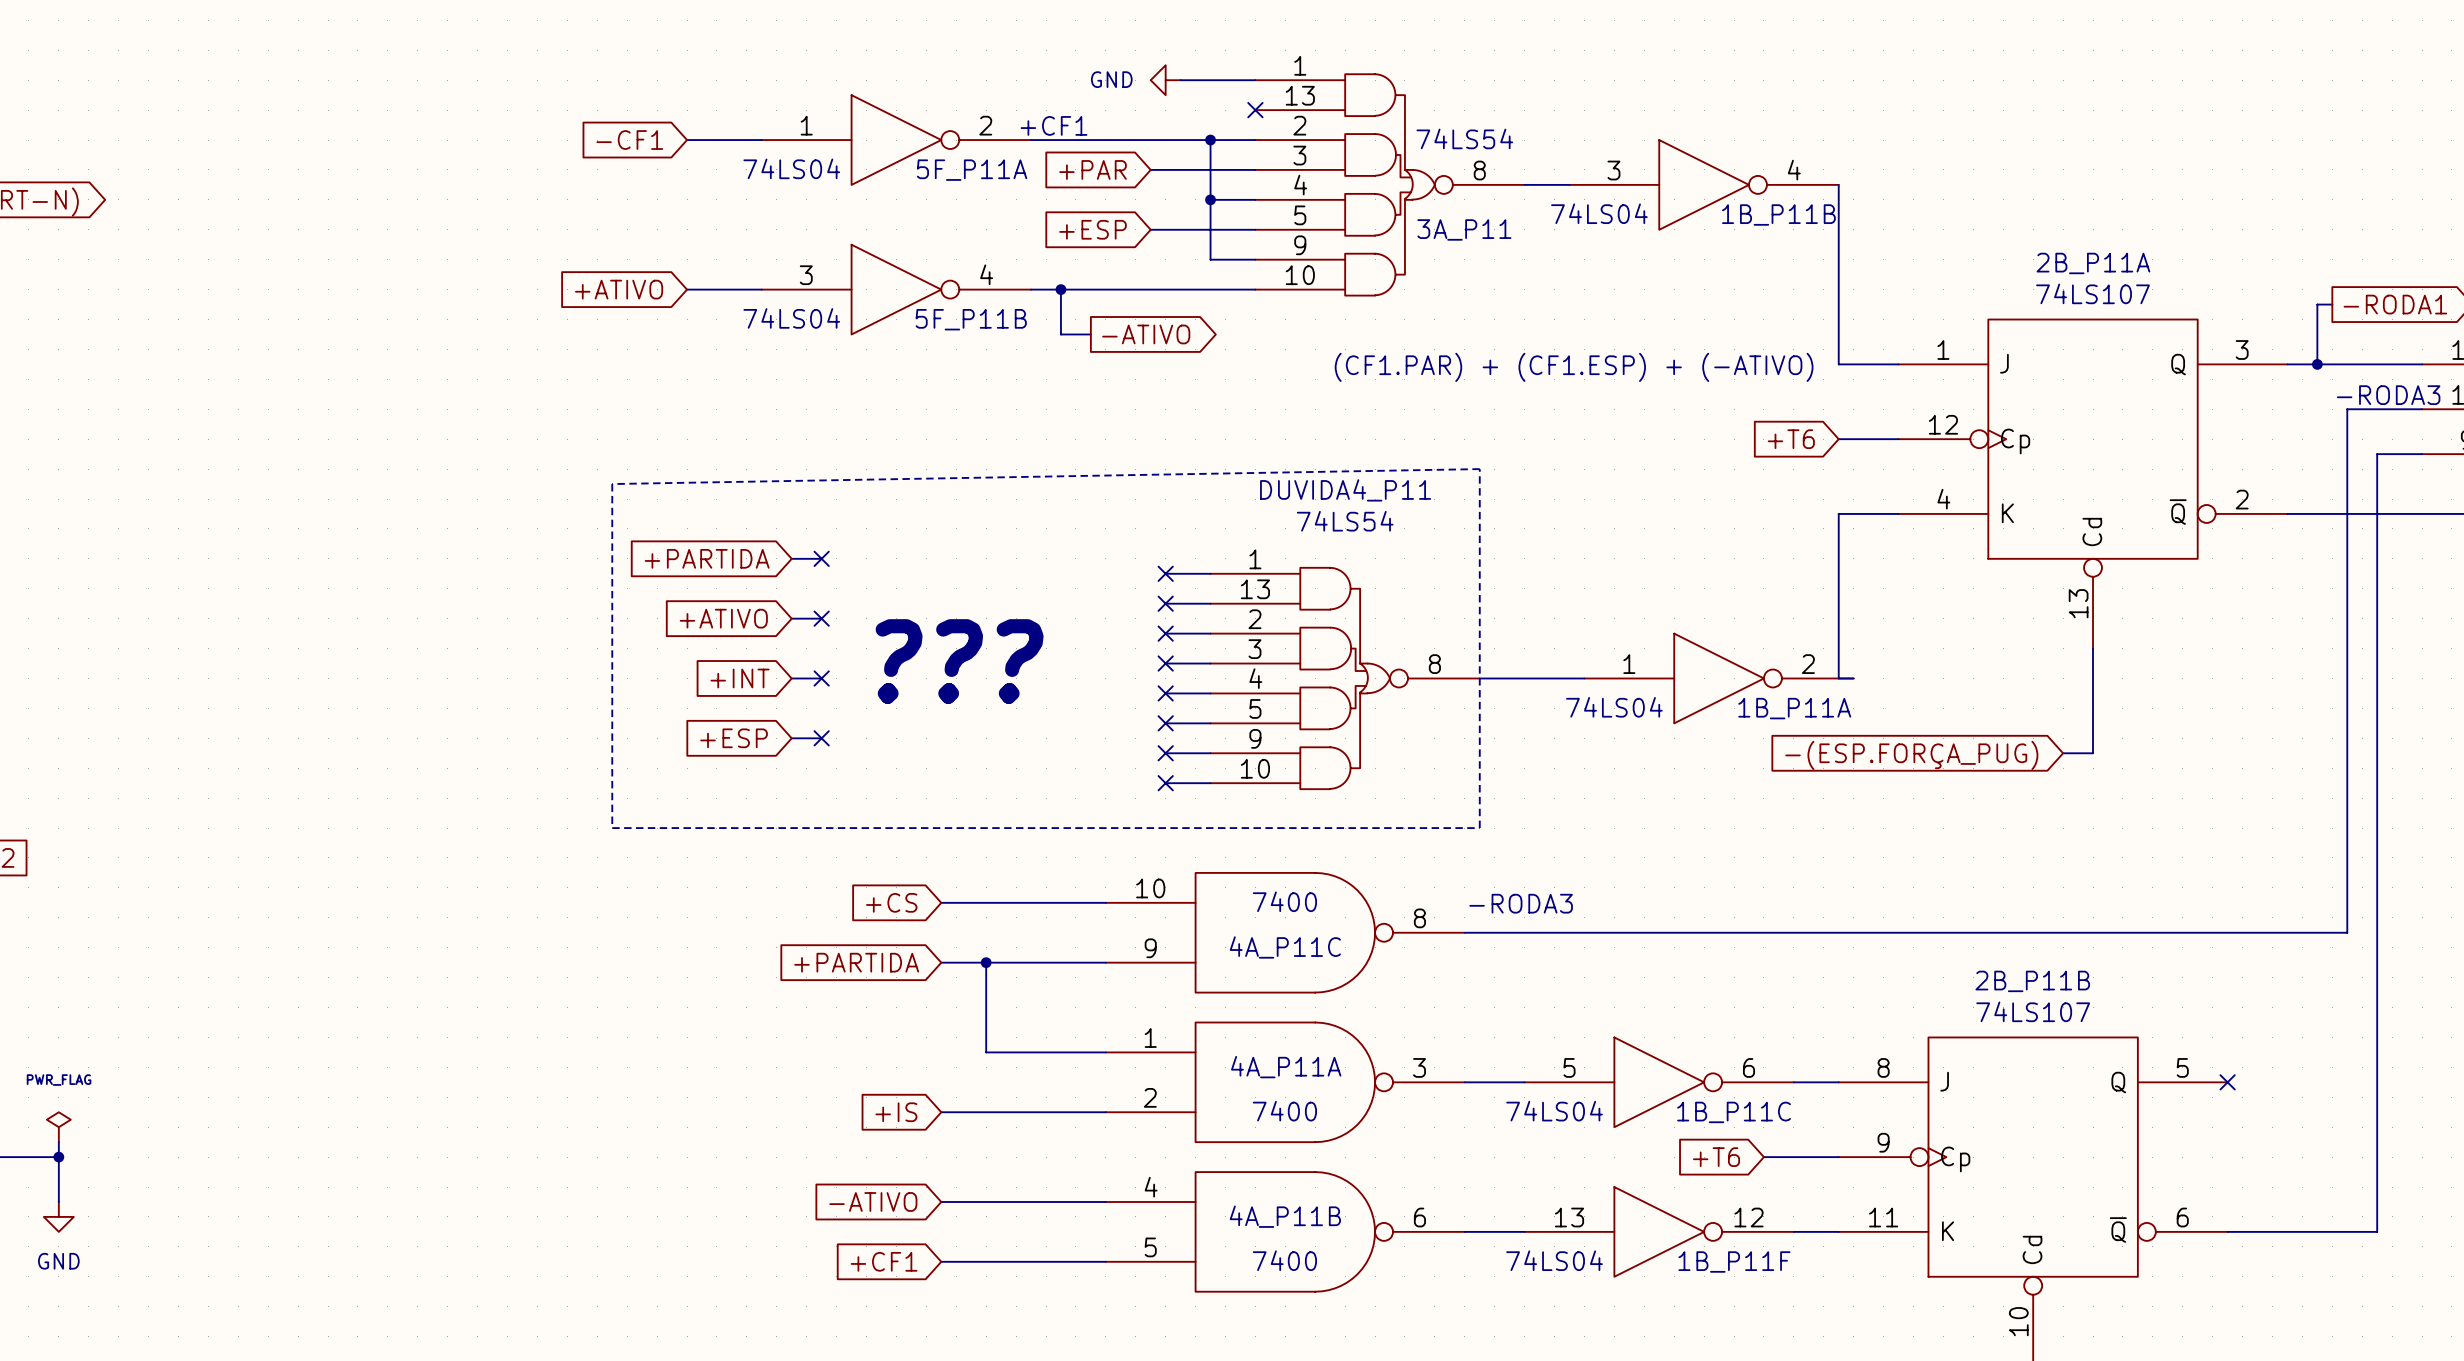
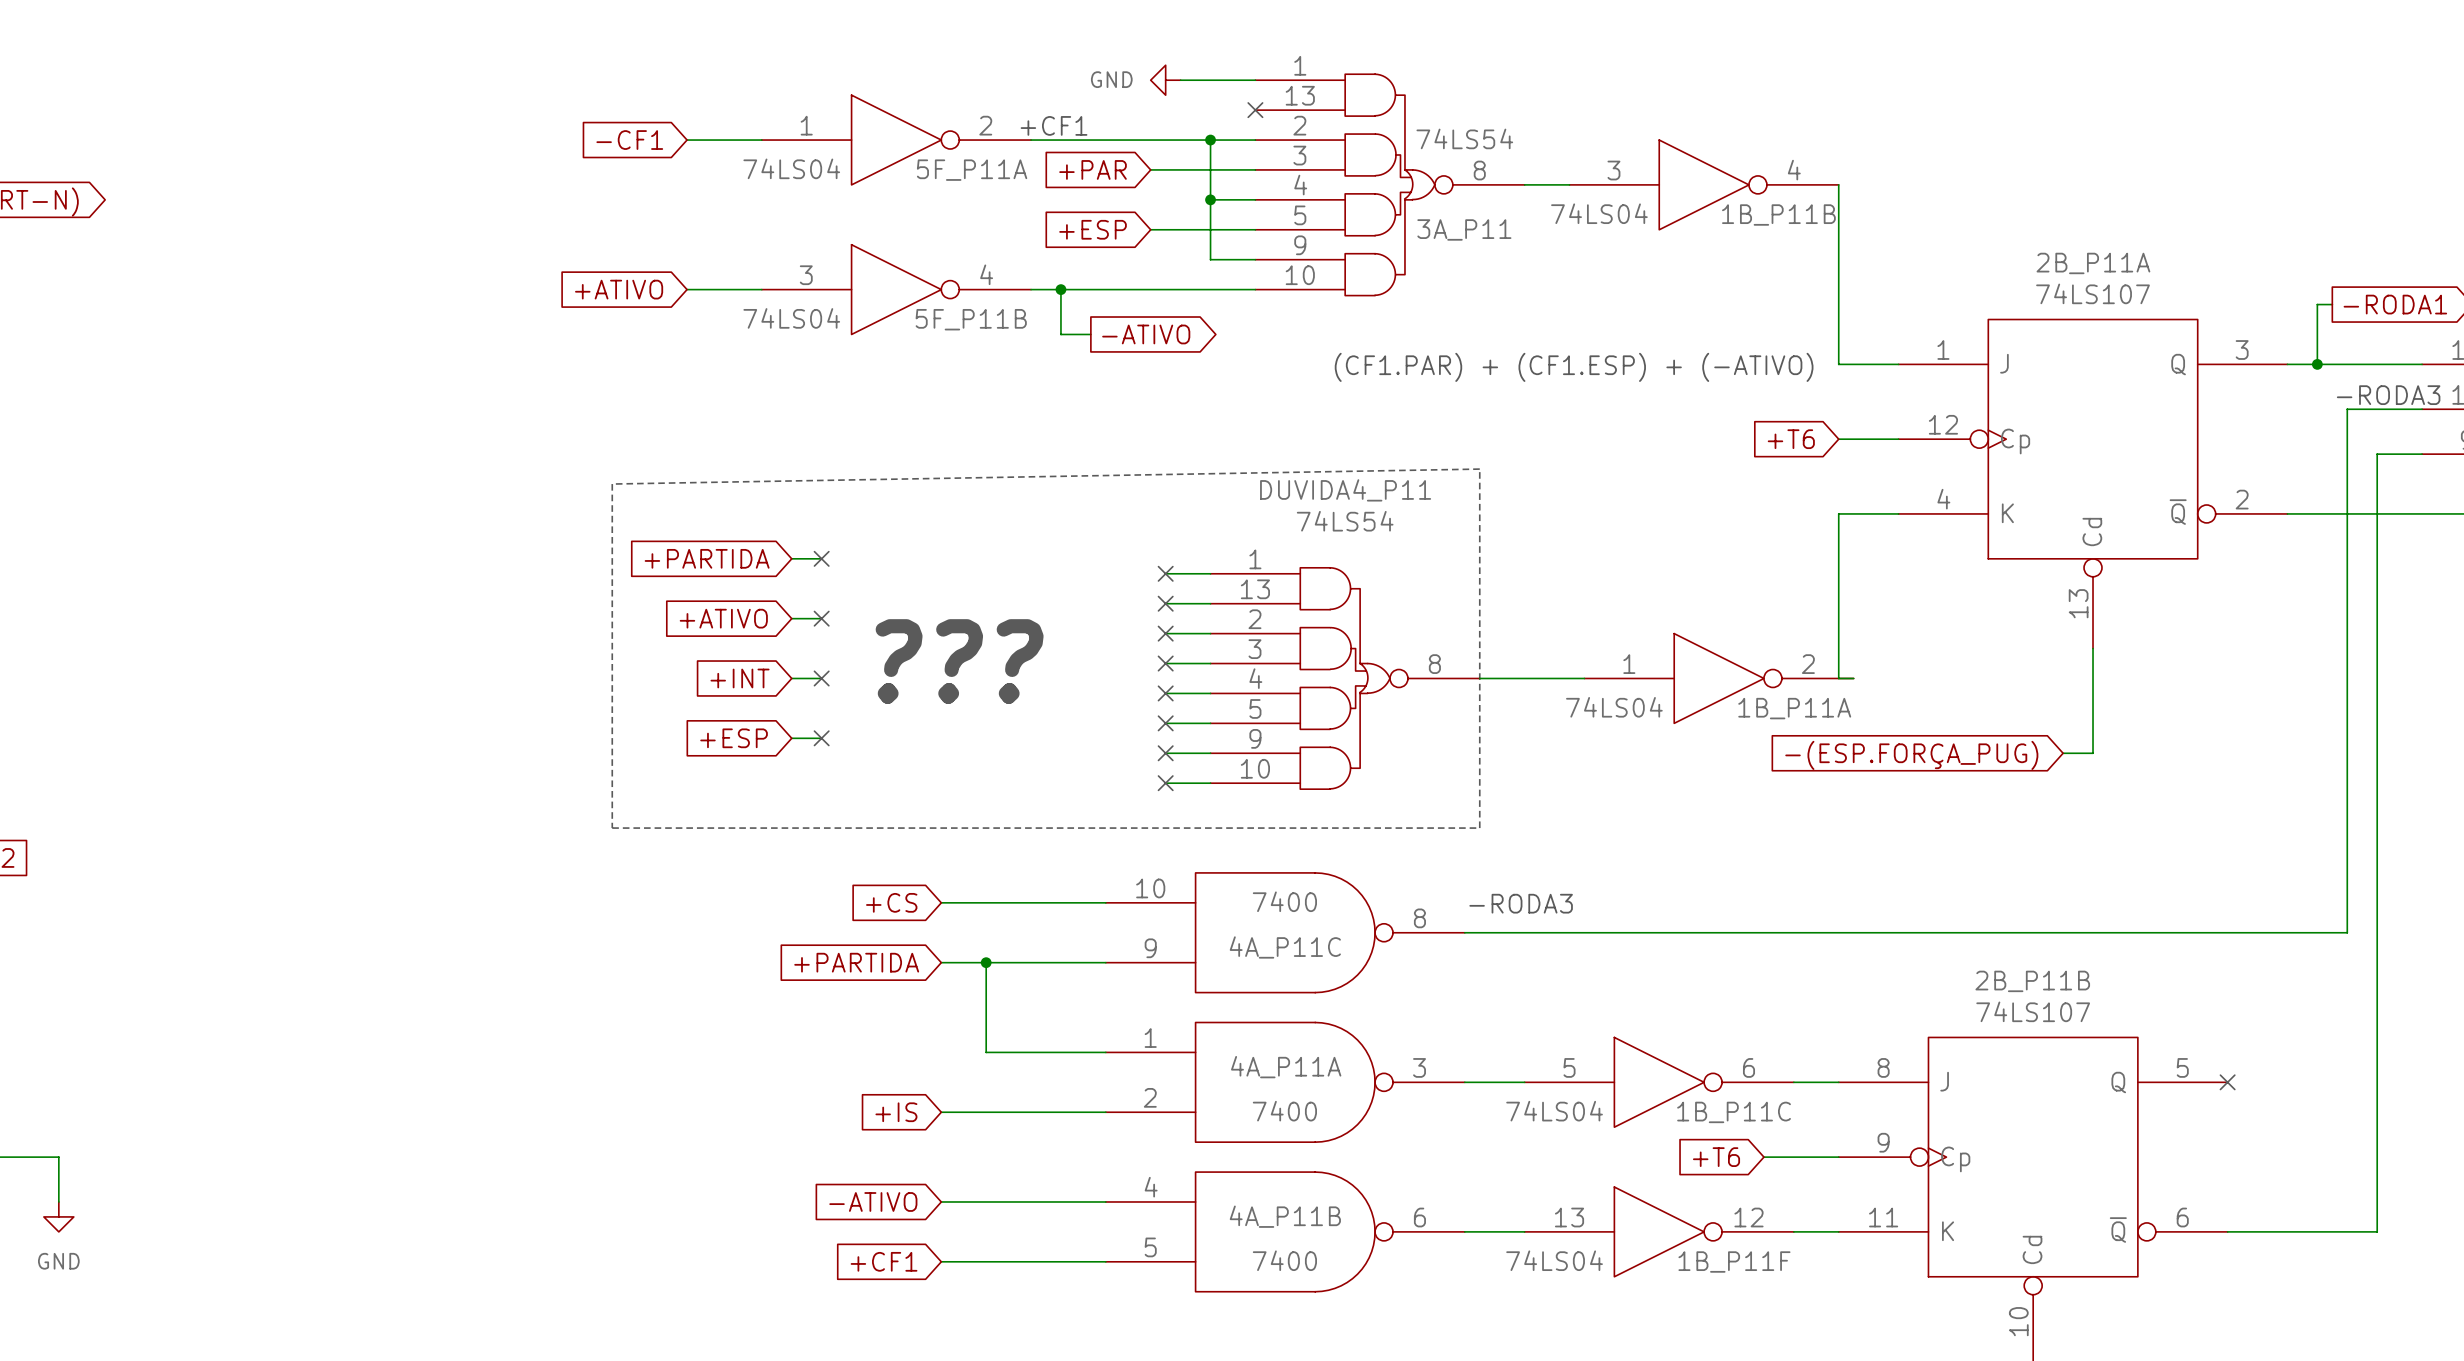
power symbol: PWR_FLAG (58, 1127) -> none
wire: (58, 1142) (58, 1157) -> none
junction: (58, 1157) -> none

